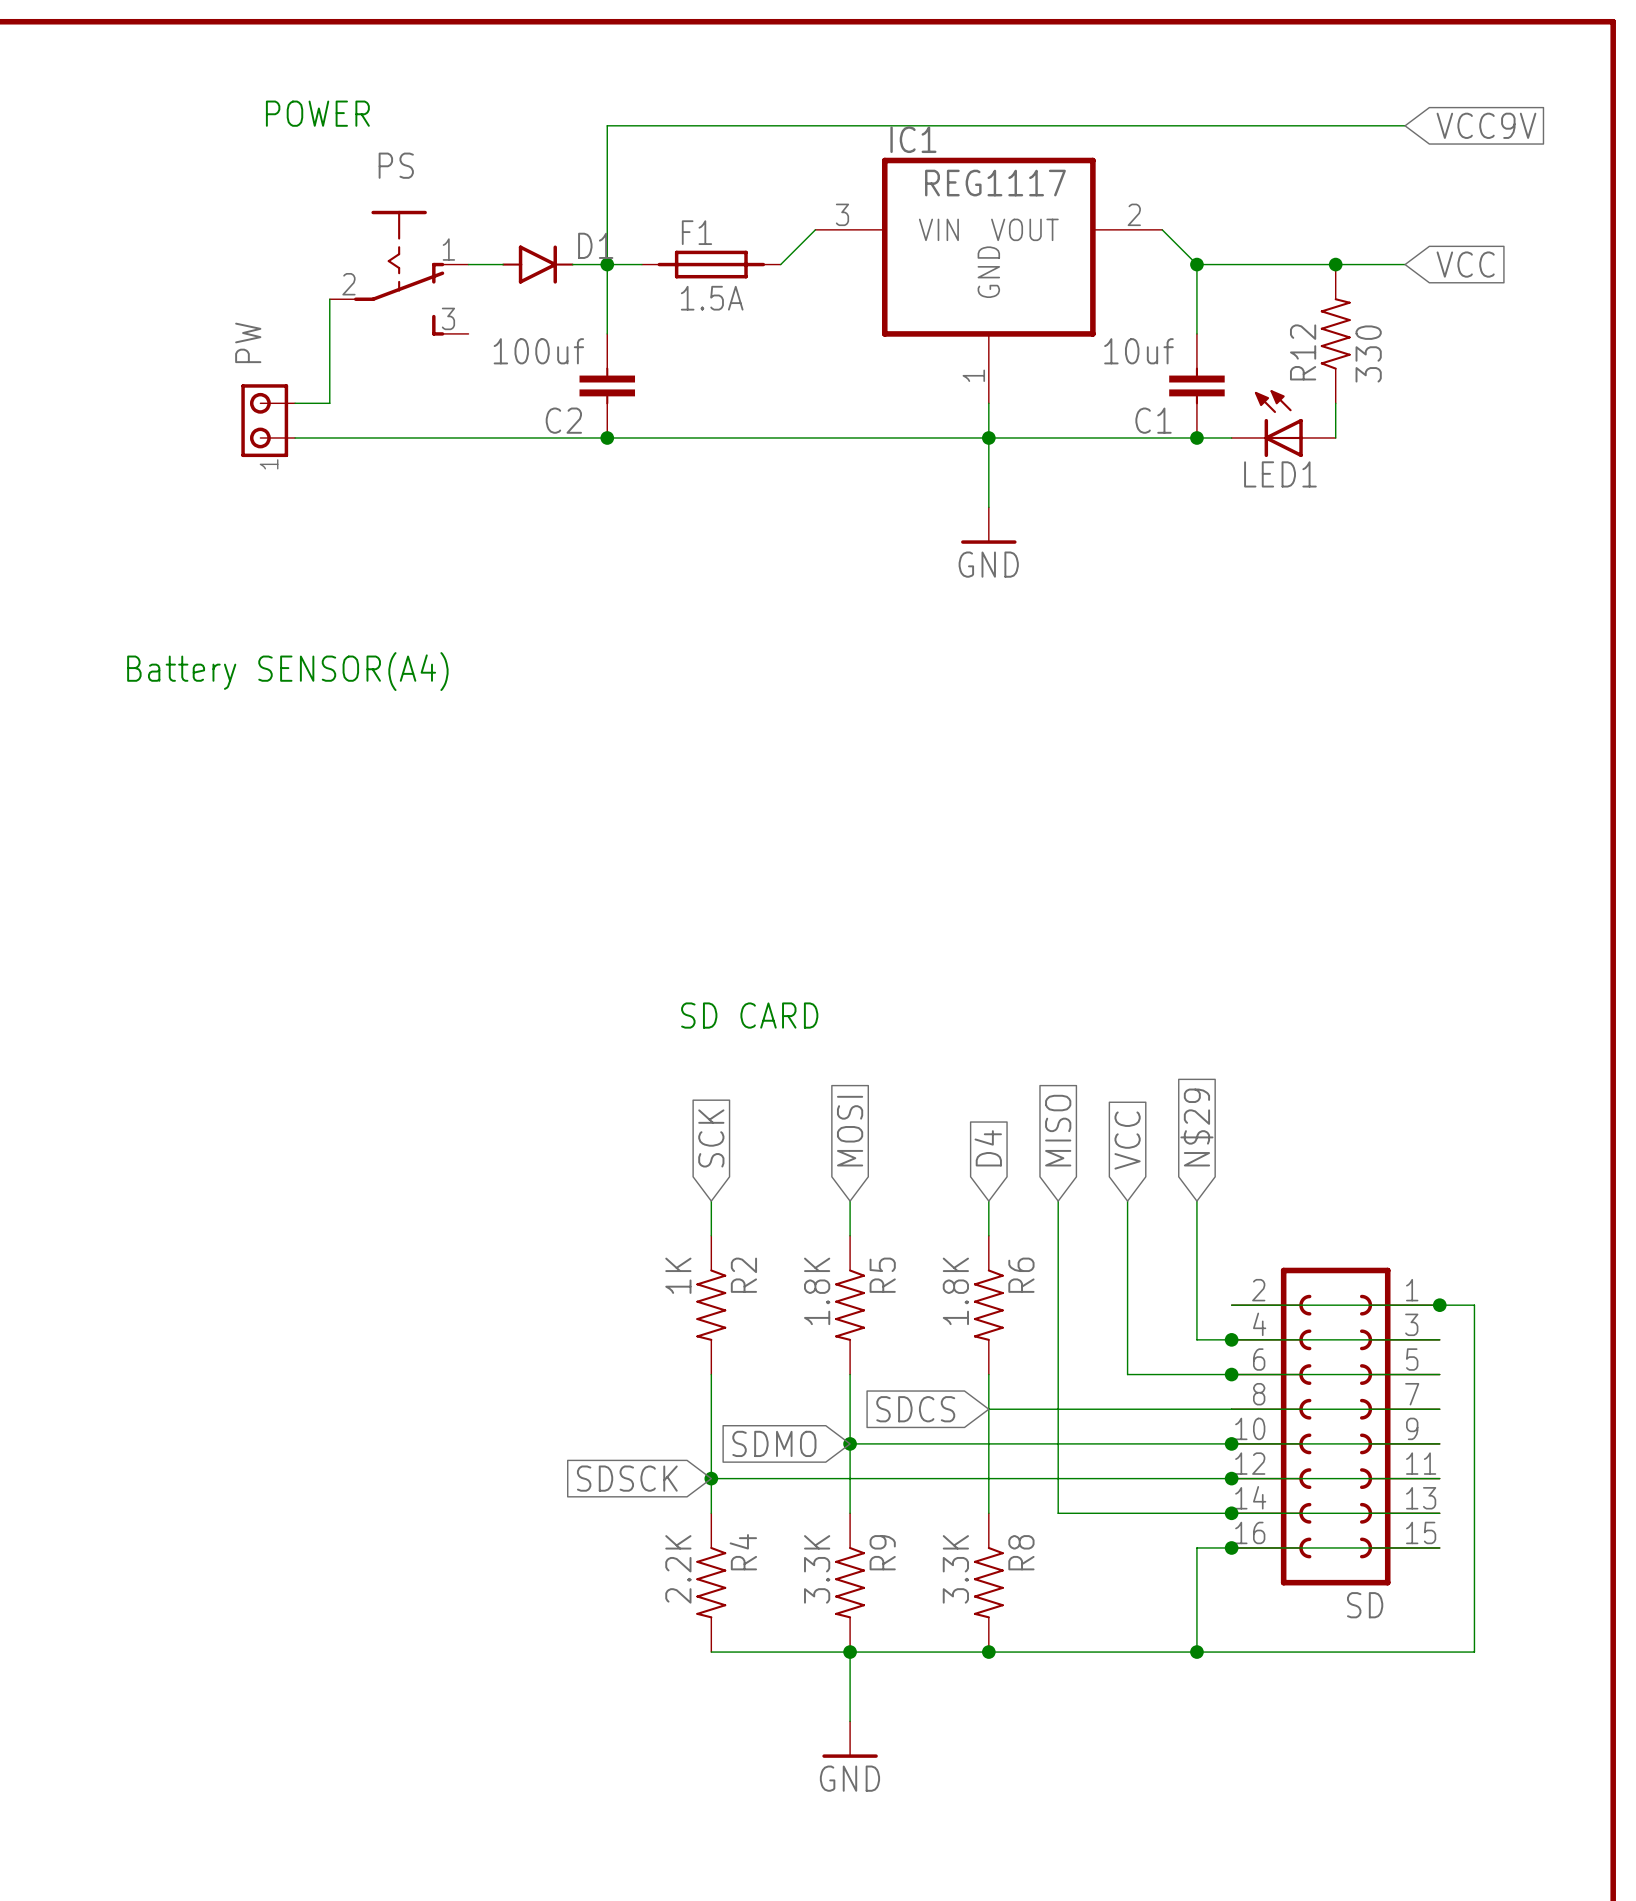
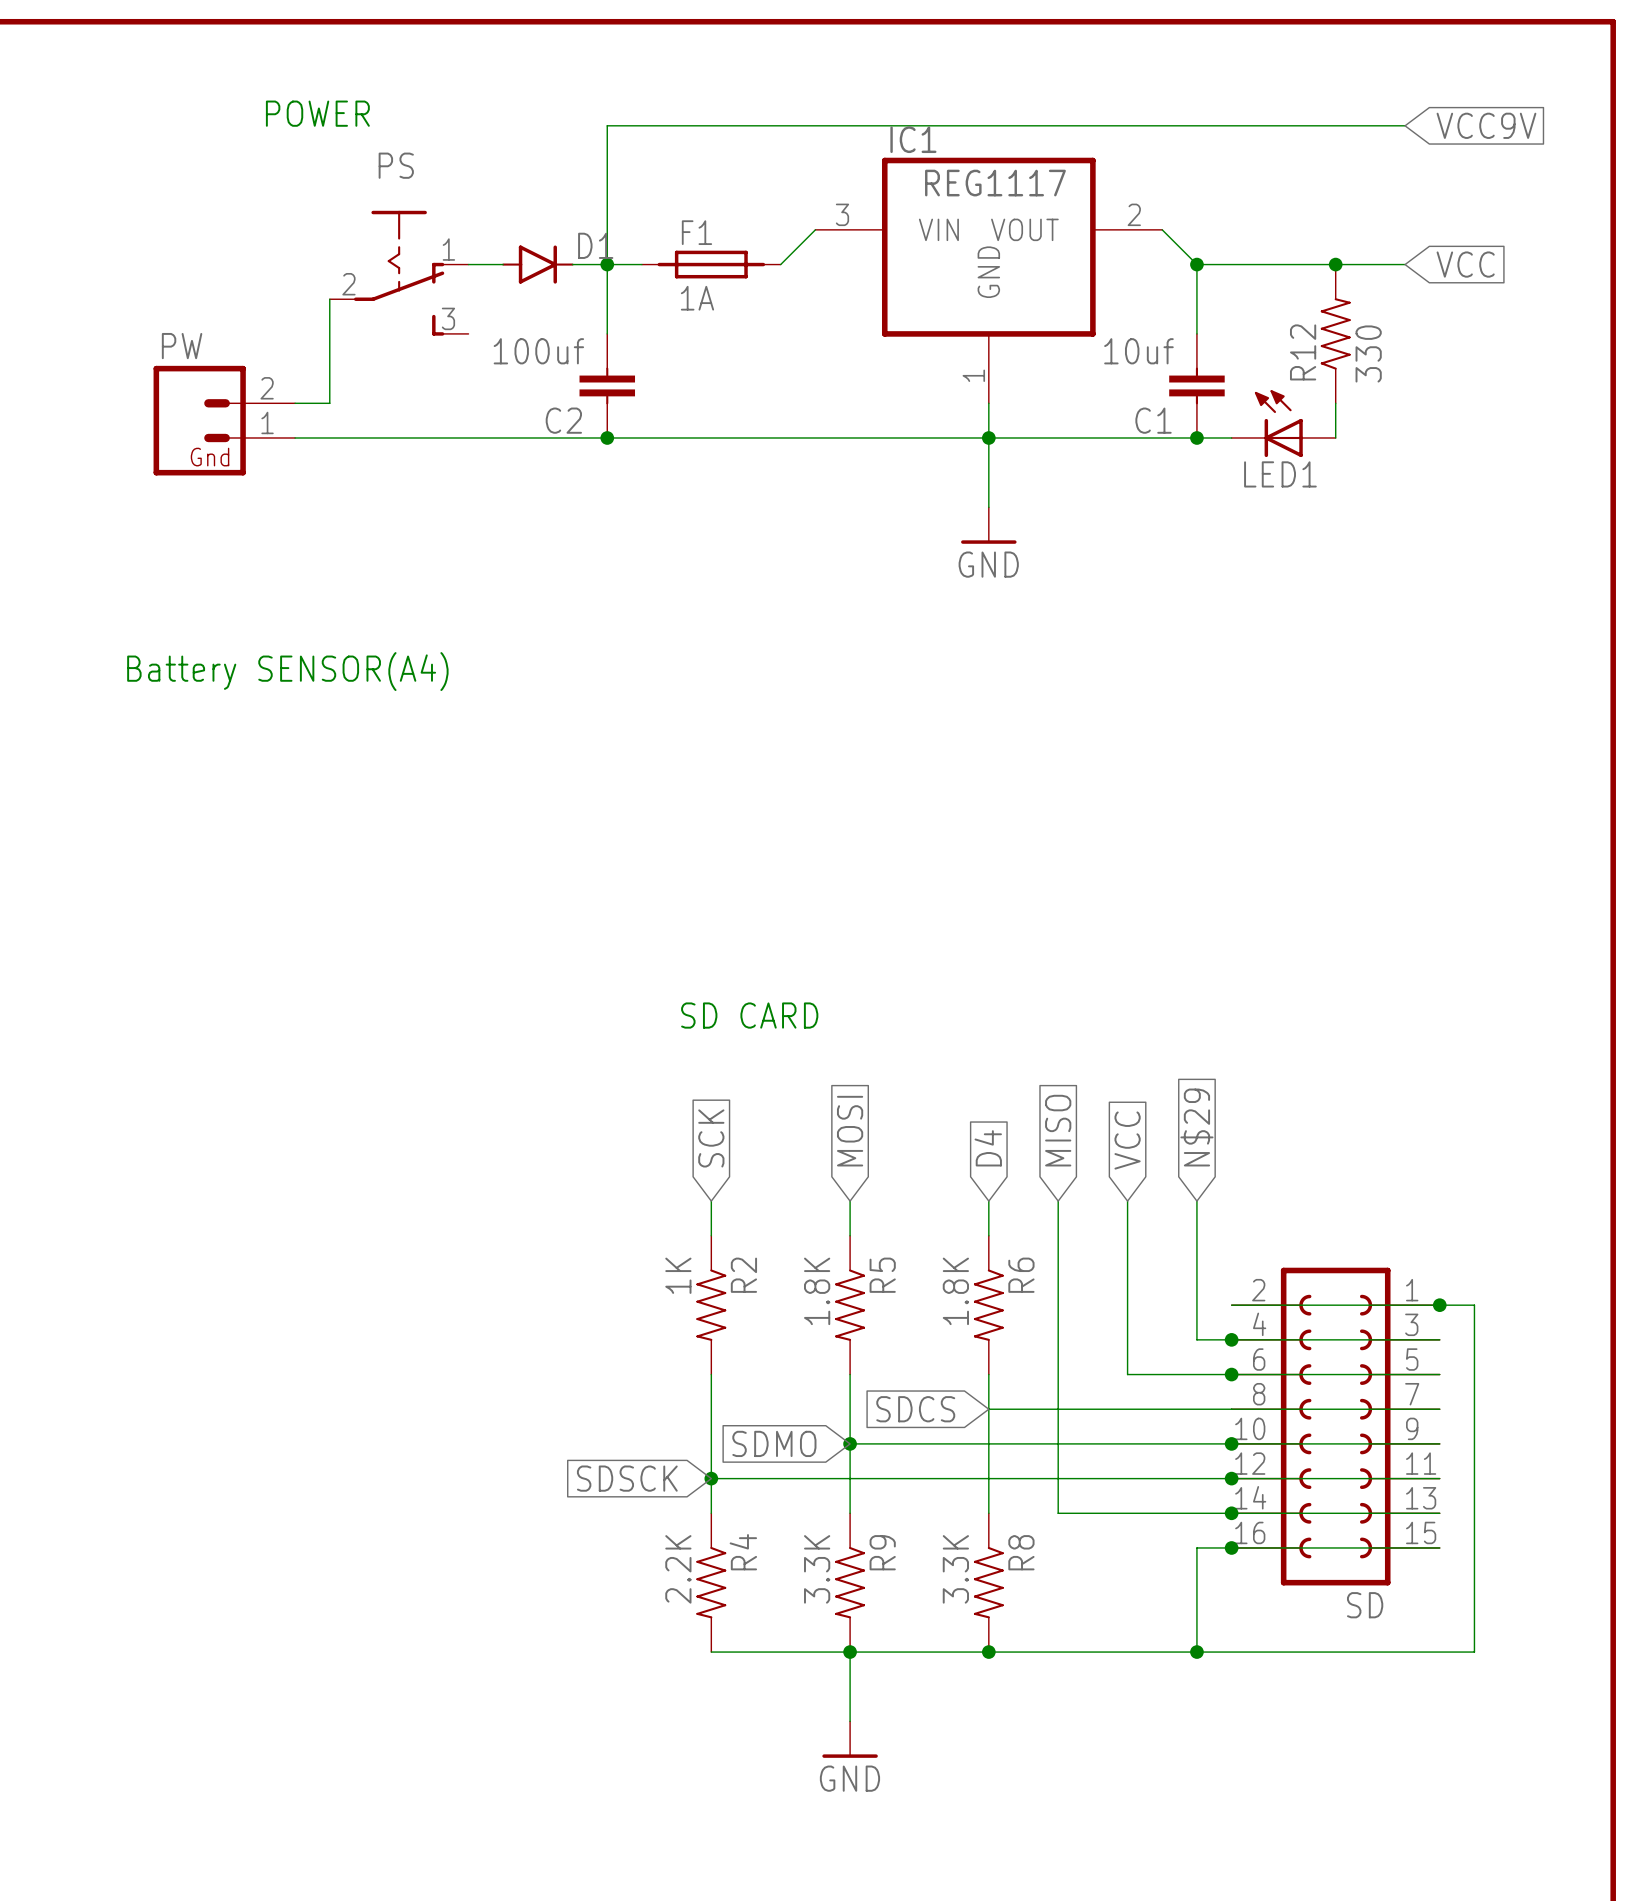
F1 value: 1.5A (712, 298) -> 1A (697, 298)
PW: none -> (224, 420)
PW: (268, 420) -> none

